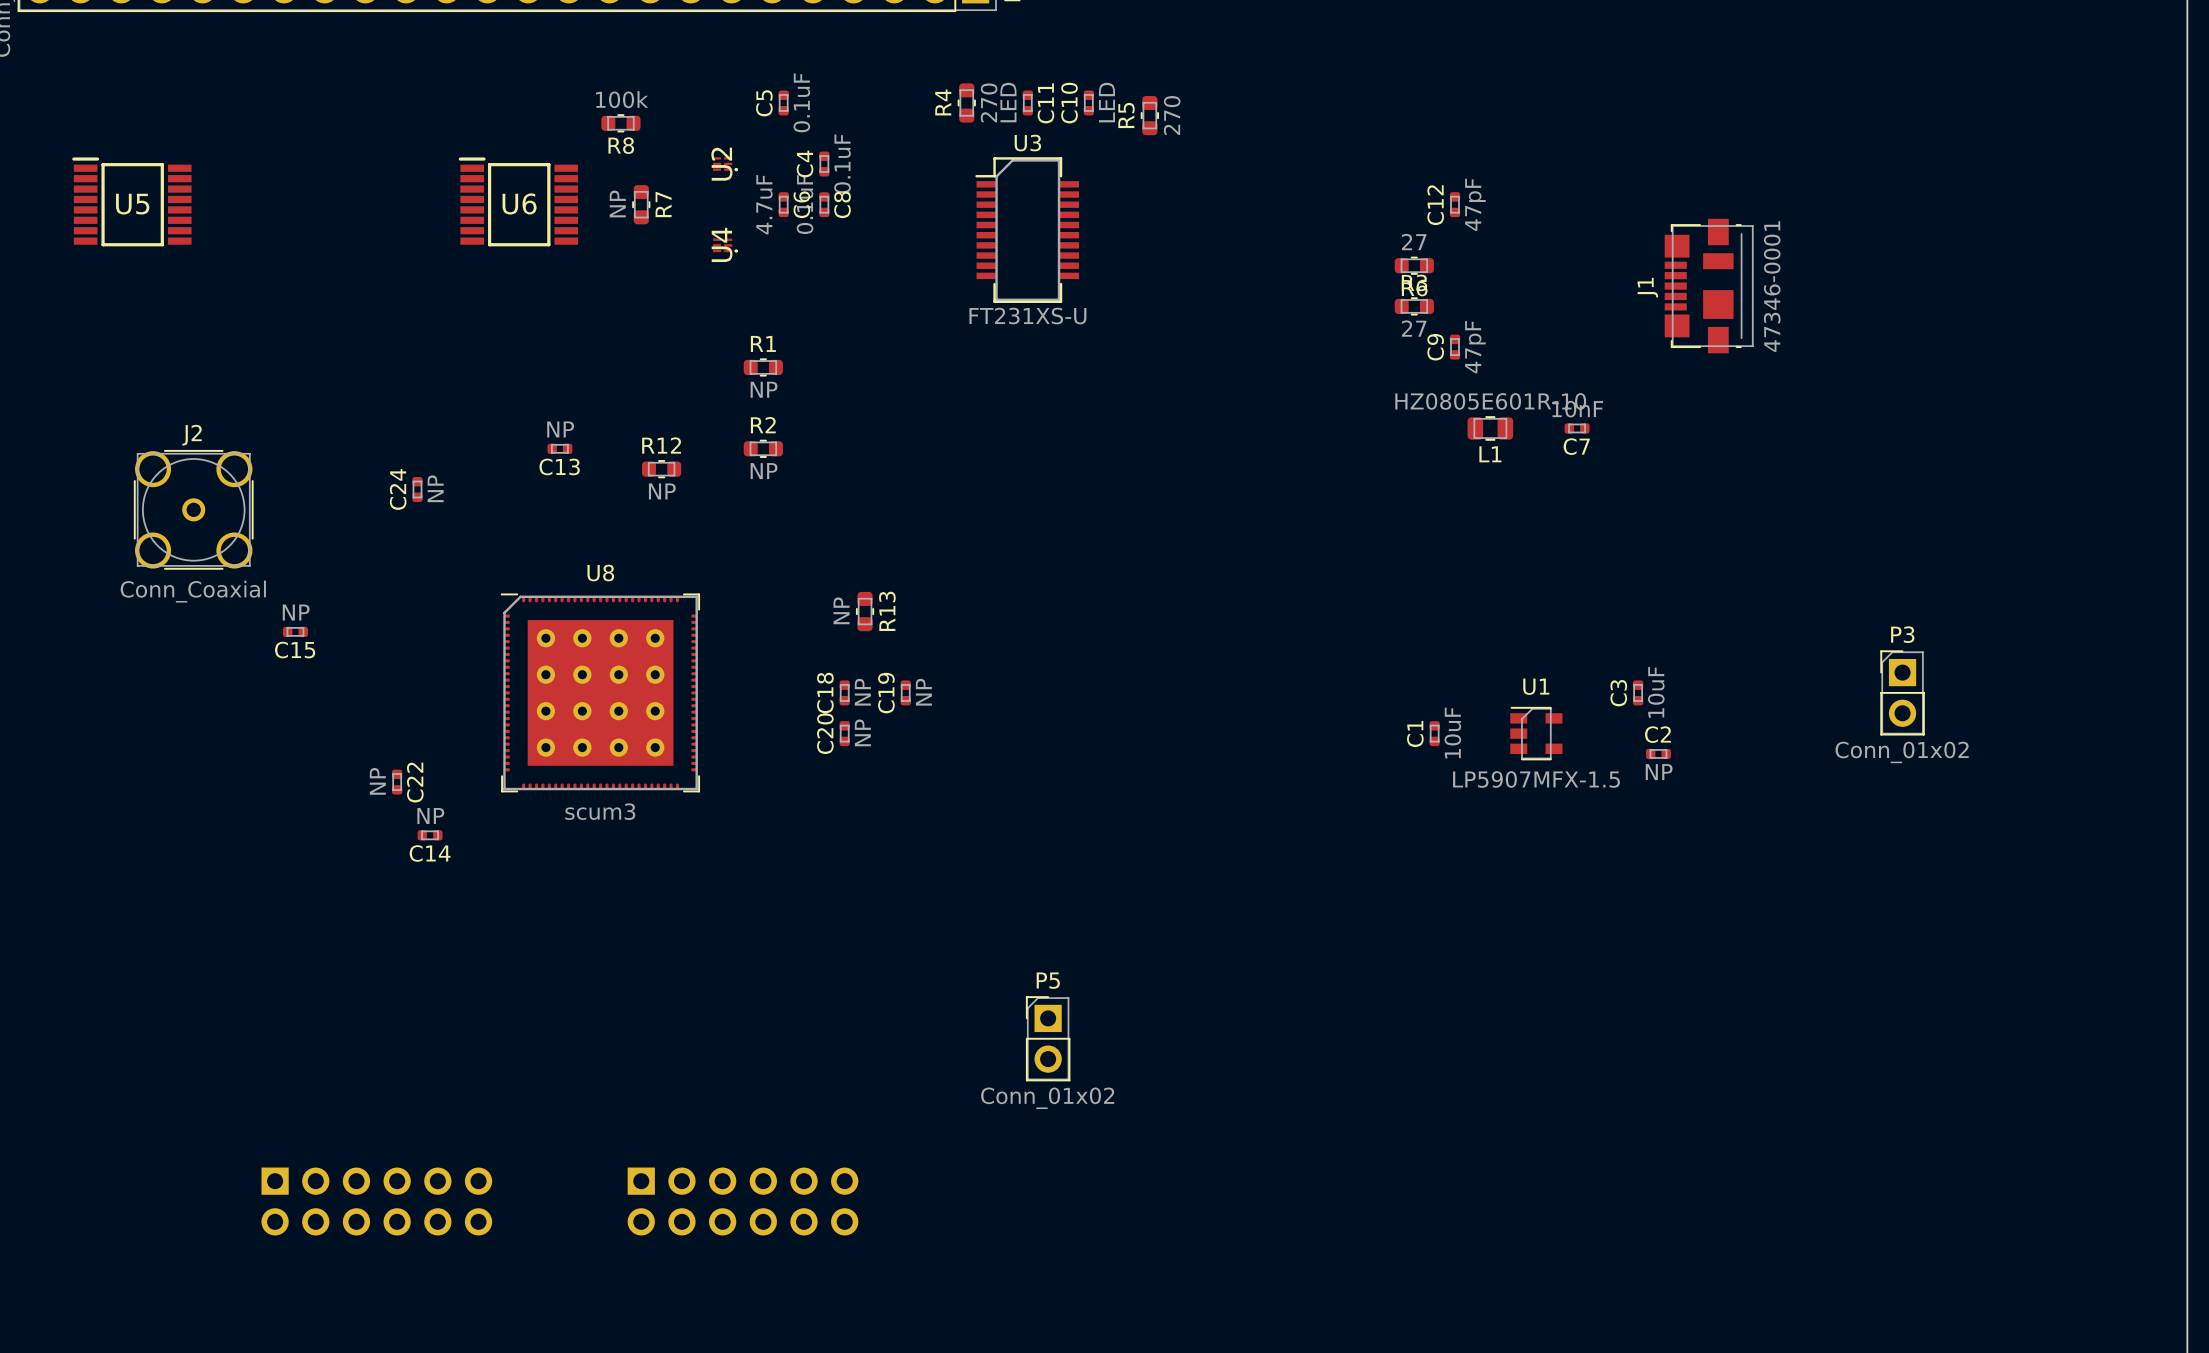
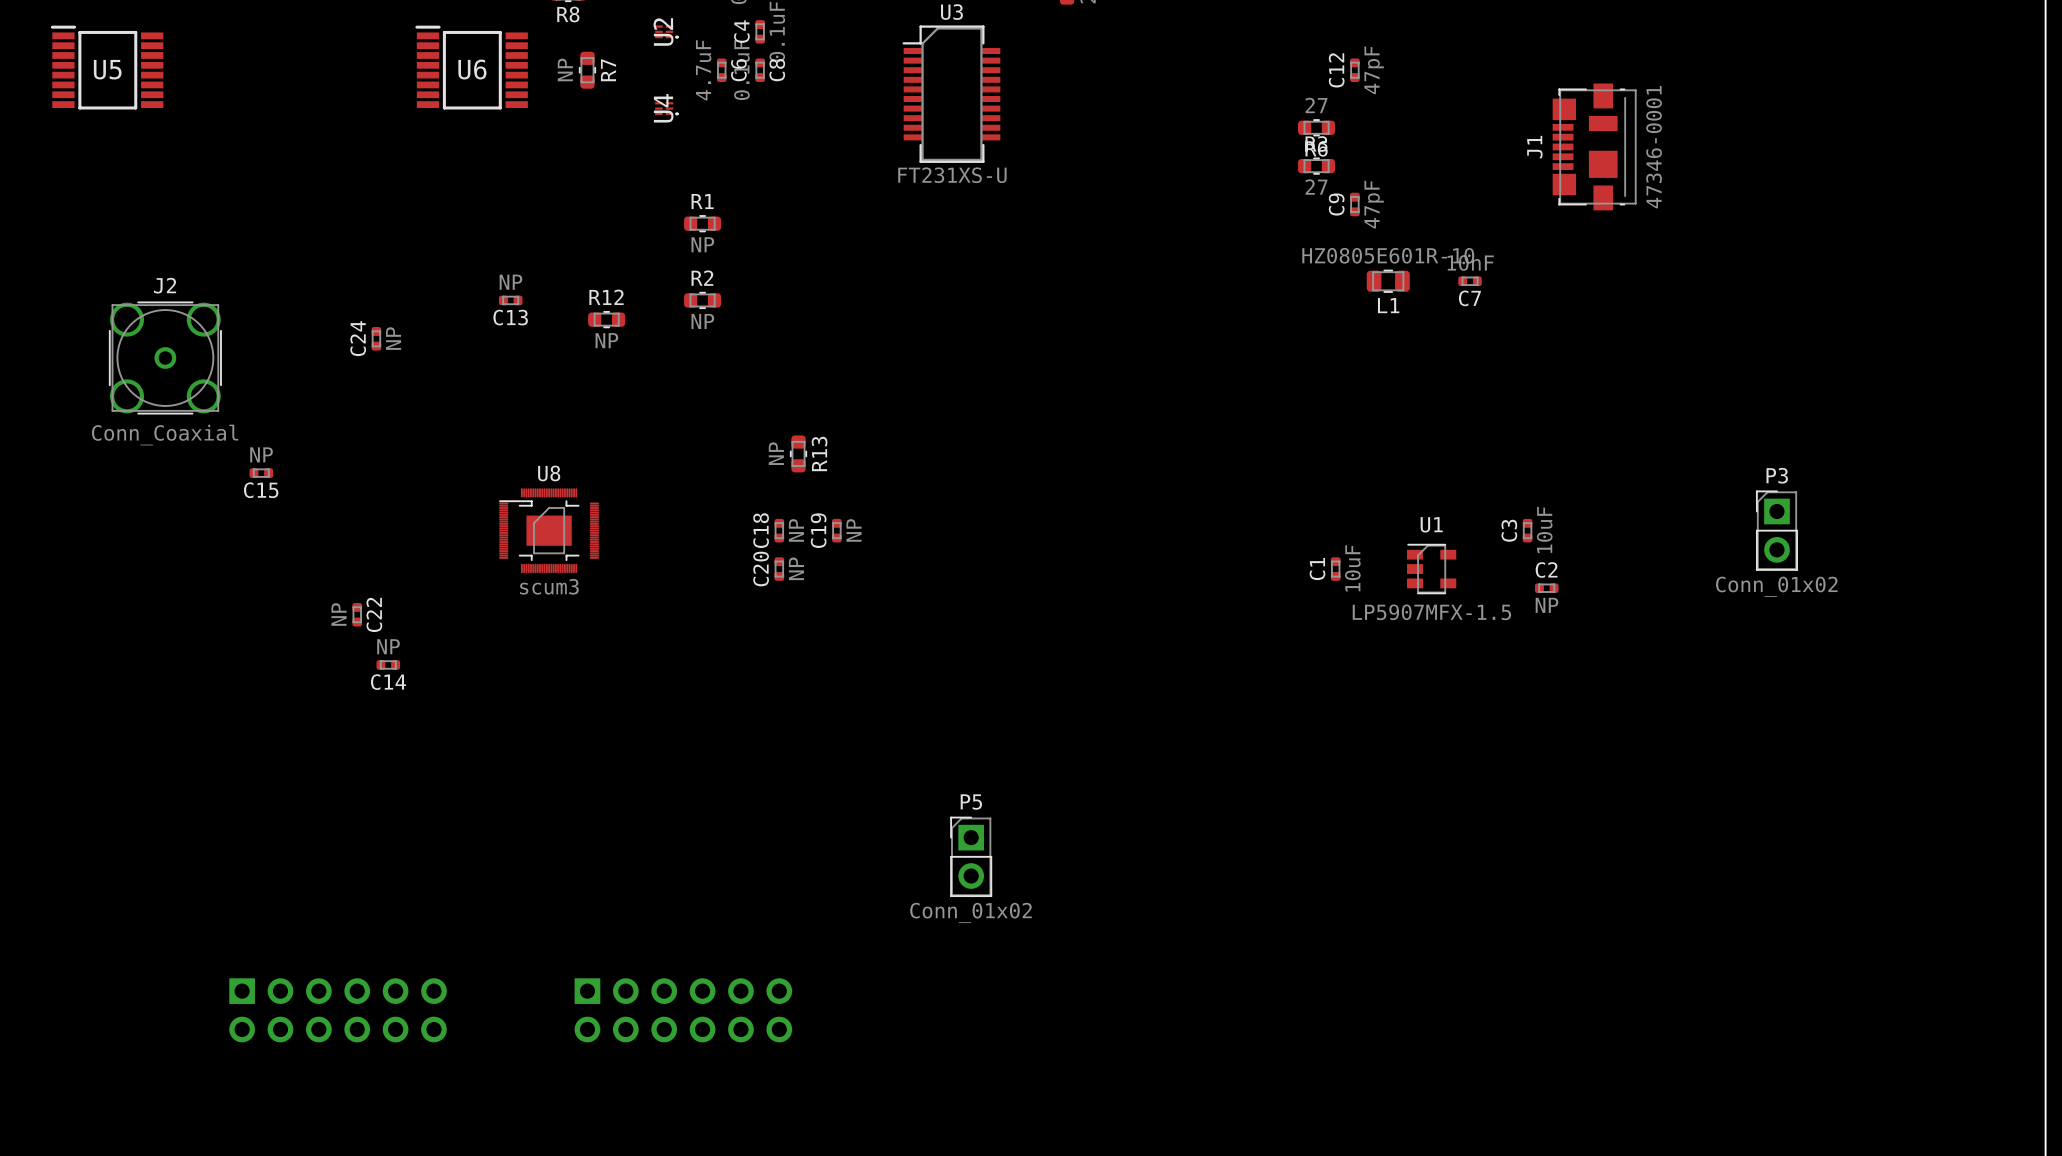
U8 name position: U8 (600, 573) -> U8 (549, 473)
U8 footprint: [500, 593, 701, 793] -> [499, 489, 599, 573]
U8 value position: scum3 (600, 811) -> scum3 (549, 586)

